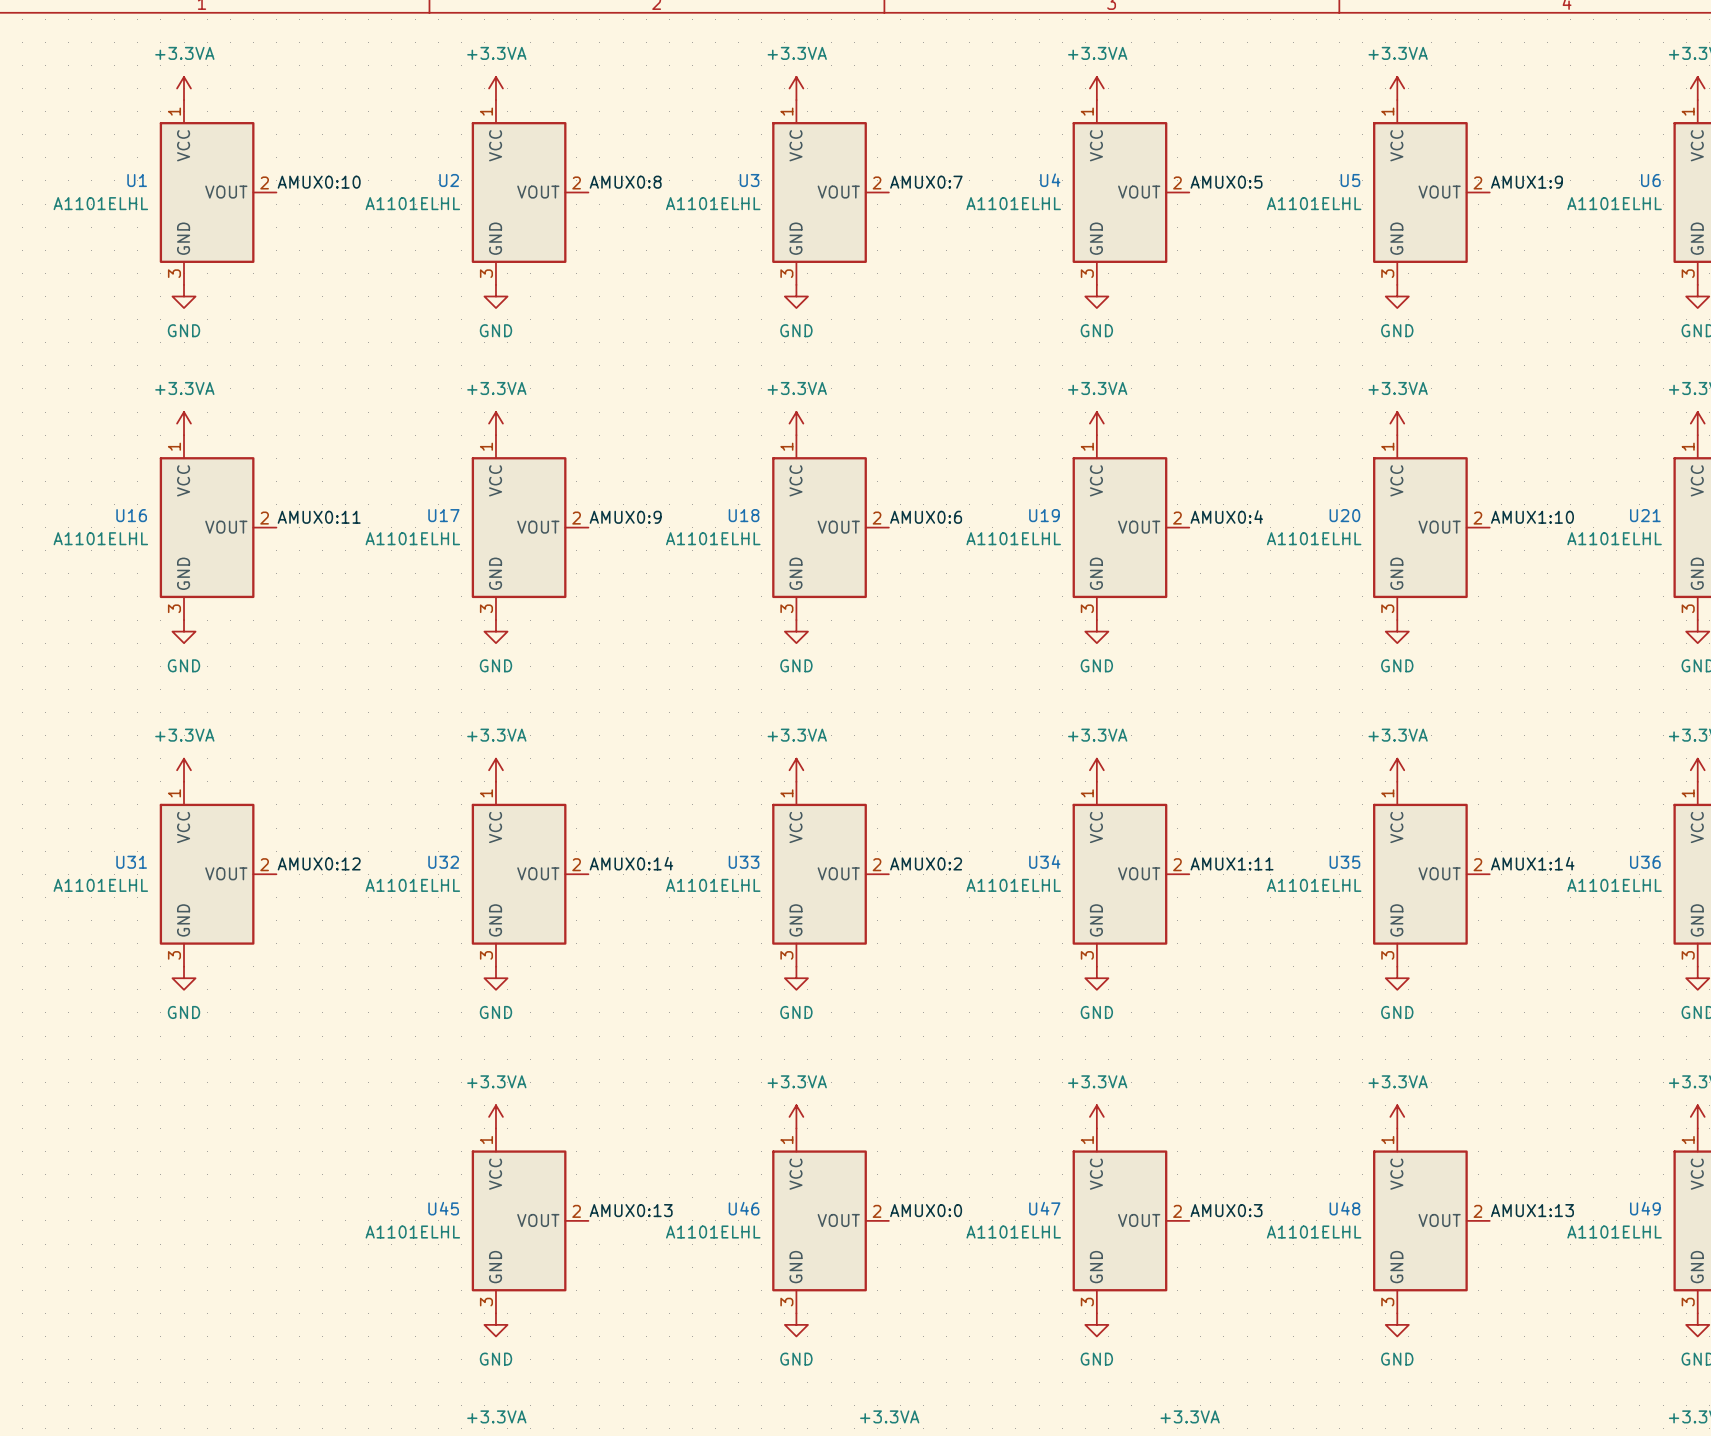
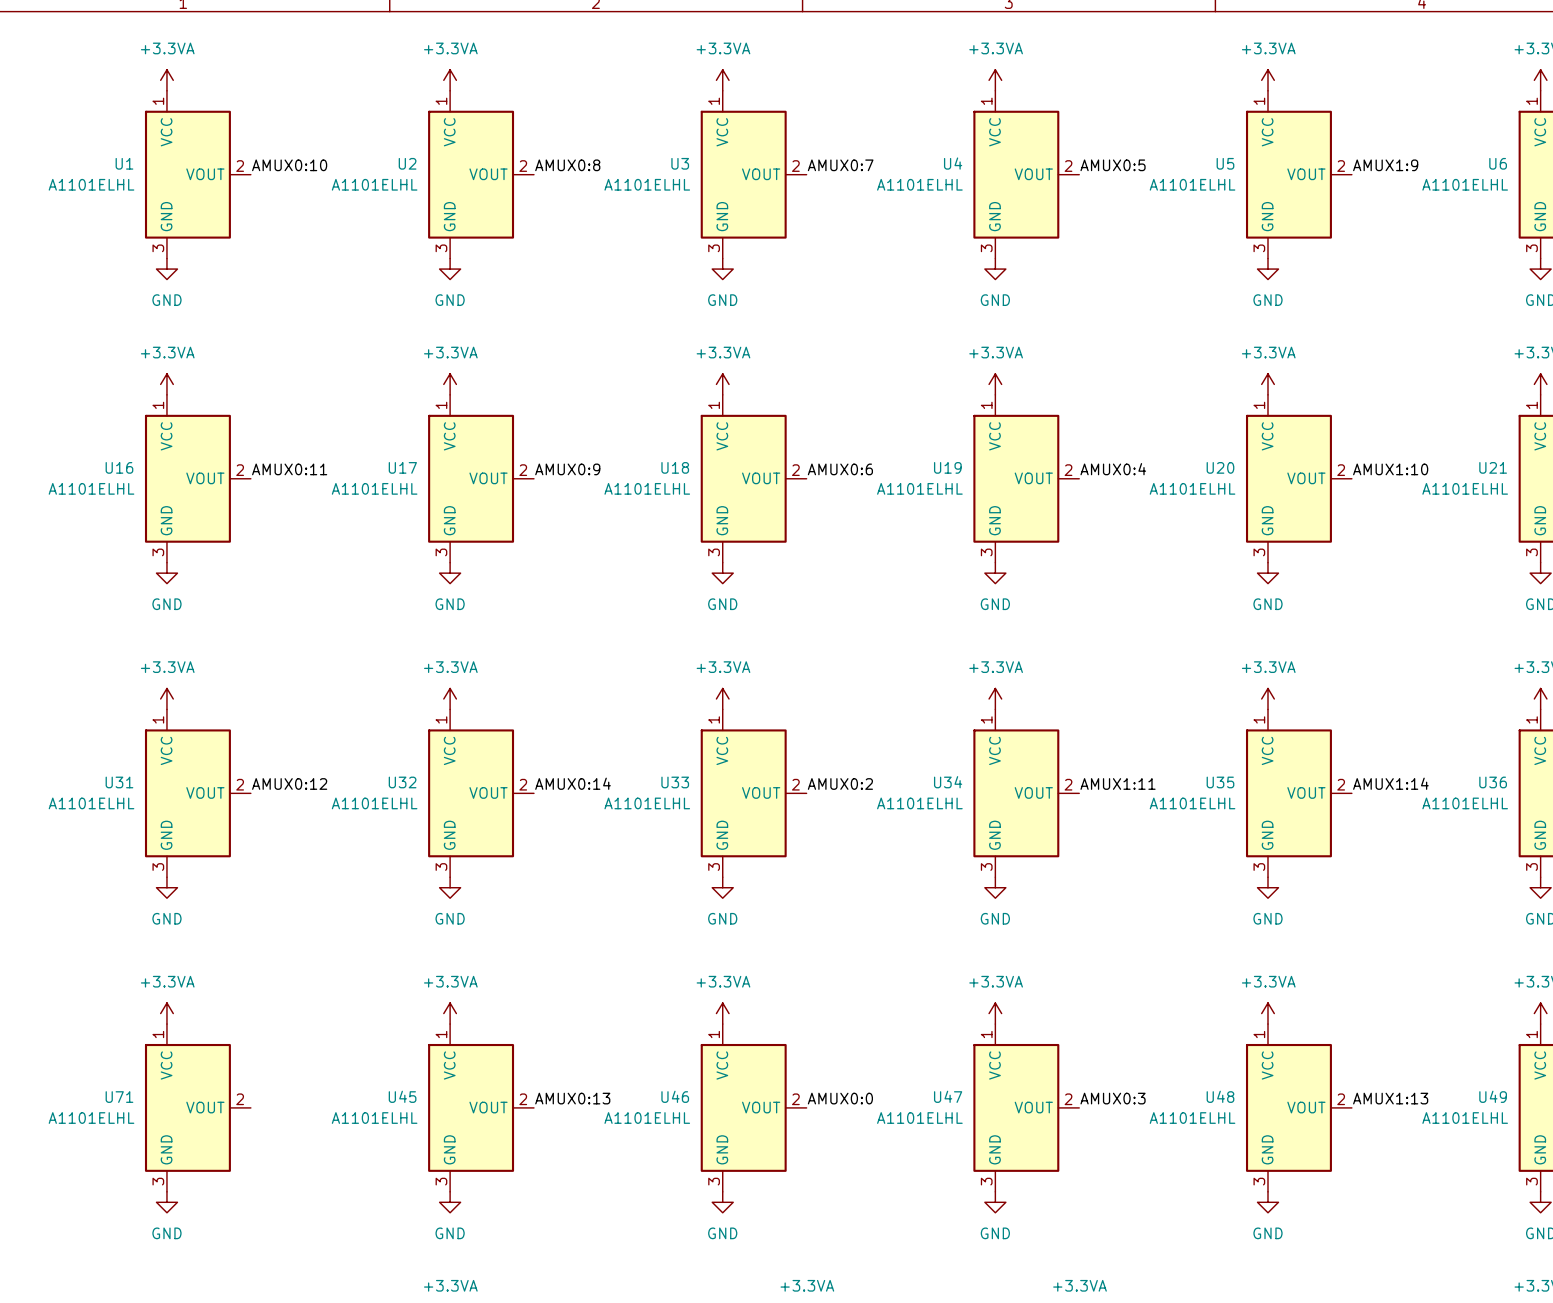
power symbol: none -> +3.3VA (166, 1013)
U71: none -> A1101ELHL (197, 1107)
power symbol: none -> GND (166, 1202)

